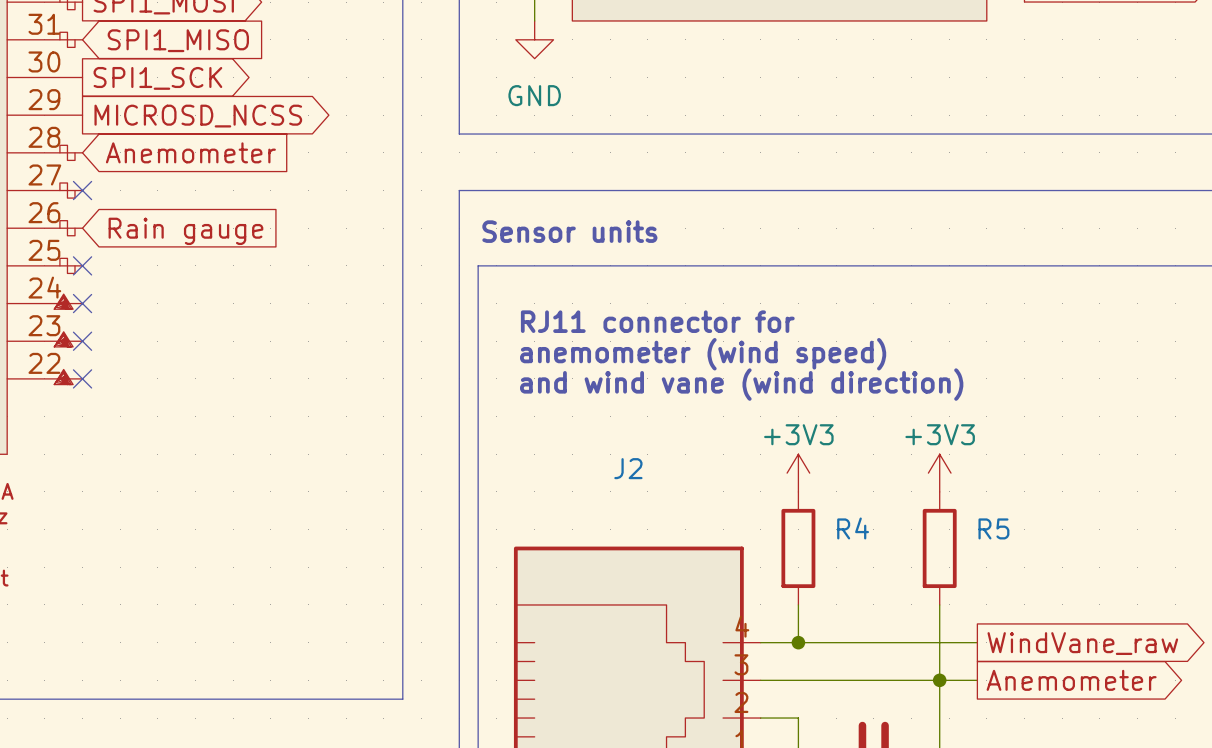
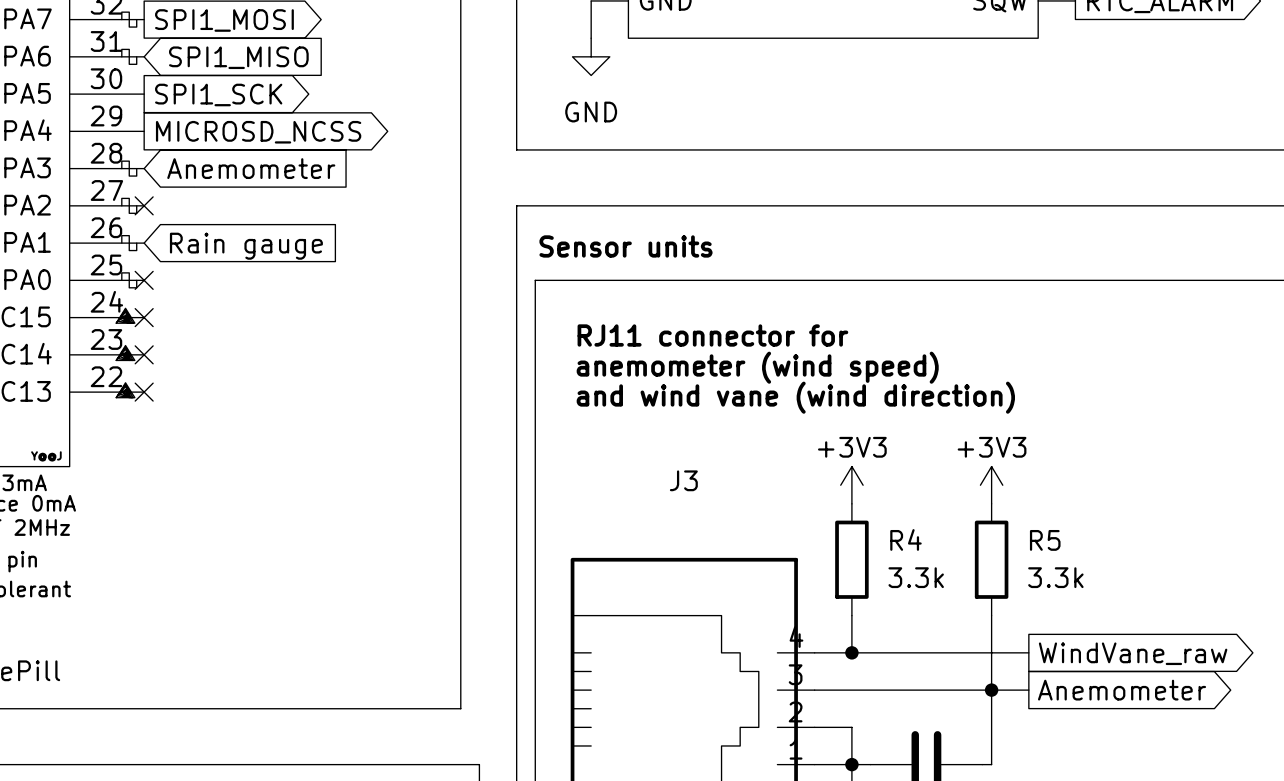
J2 name: J2 (628, 468) -> J3 (683, 480)
R4 value: none -> 3.3k (916, 577)
R5 value: none -> 3.3k (1055, 577)

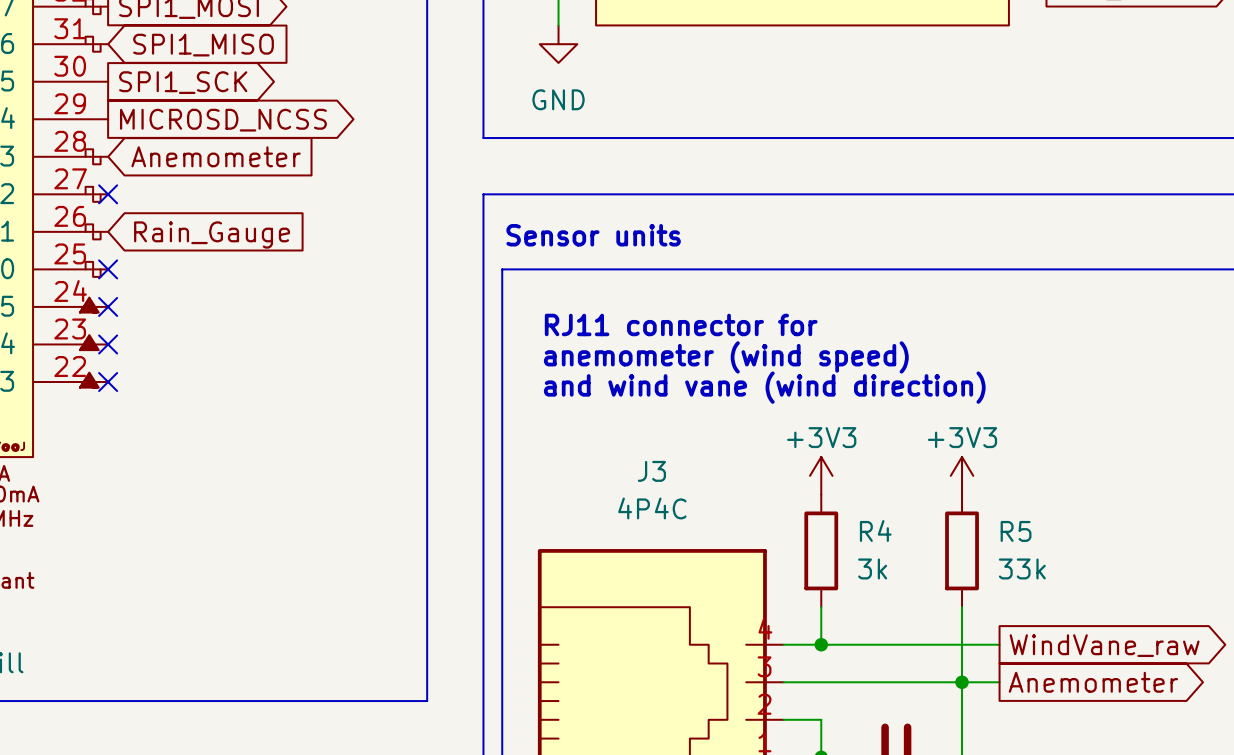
global label: Rain gauge (246, 246) -> Rain_Gauge (212, 234)
J3 value: none -> 4P4C (652, 508)
R4 value: 3.3k (916, 577) -> 3k (872, 568)
R5 value: 3.3k (1055, 577) -> 33k (1022, 568)

